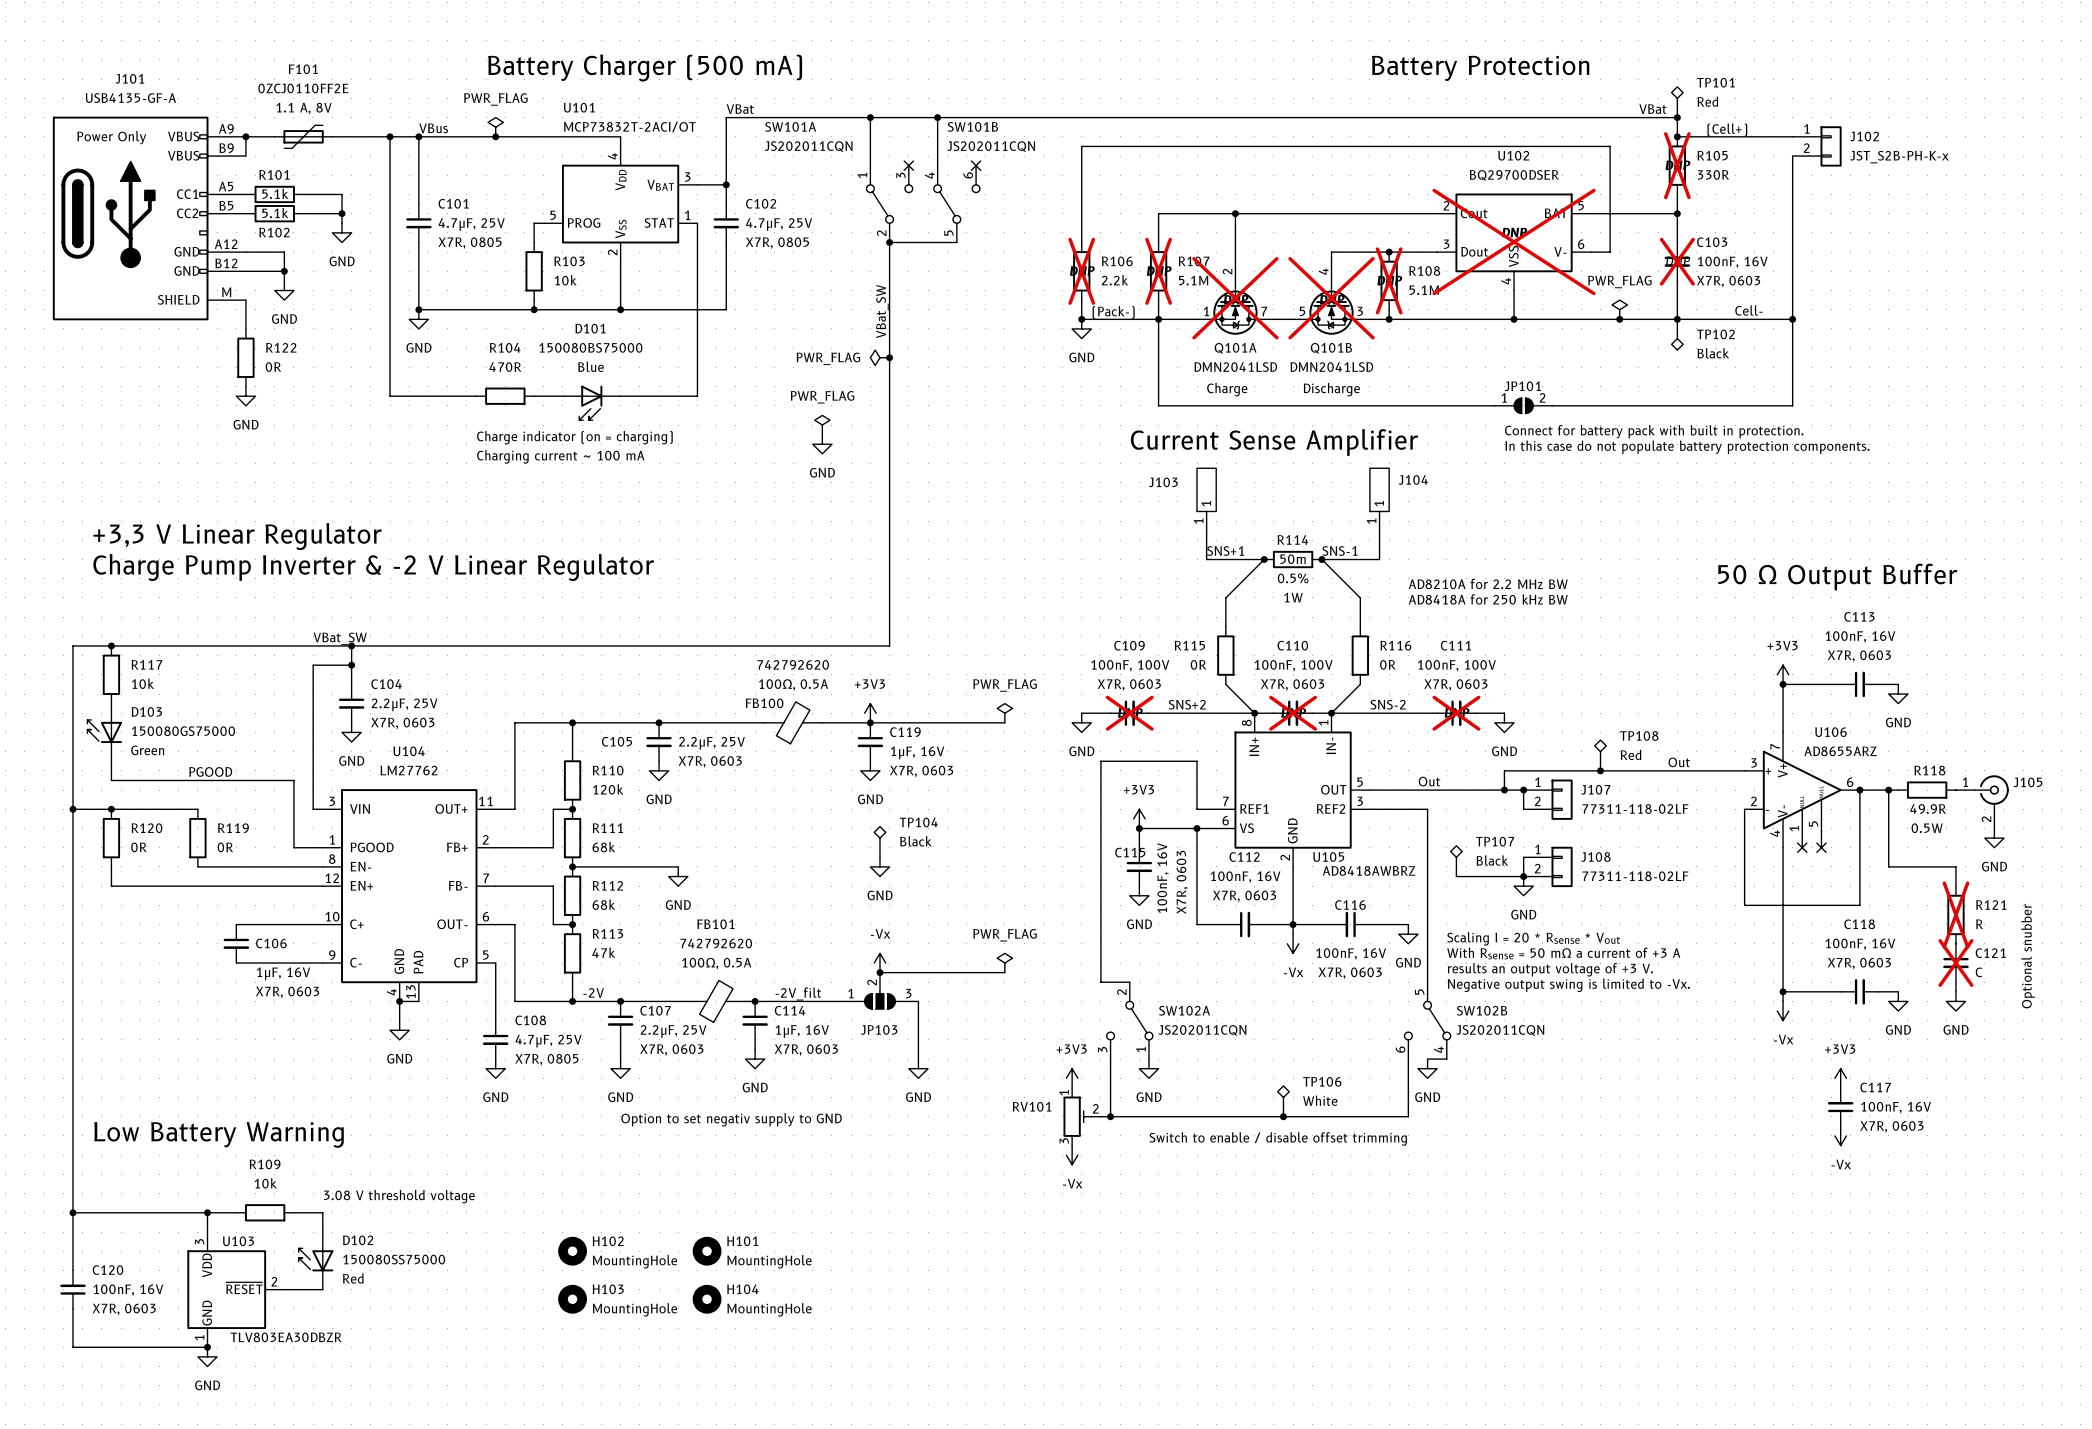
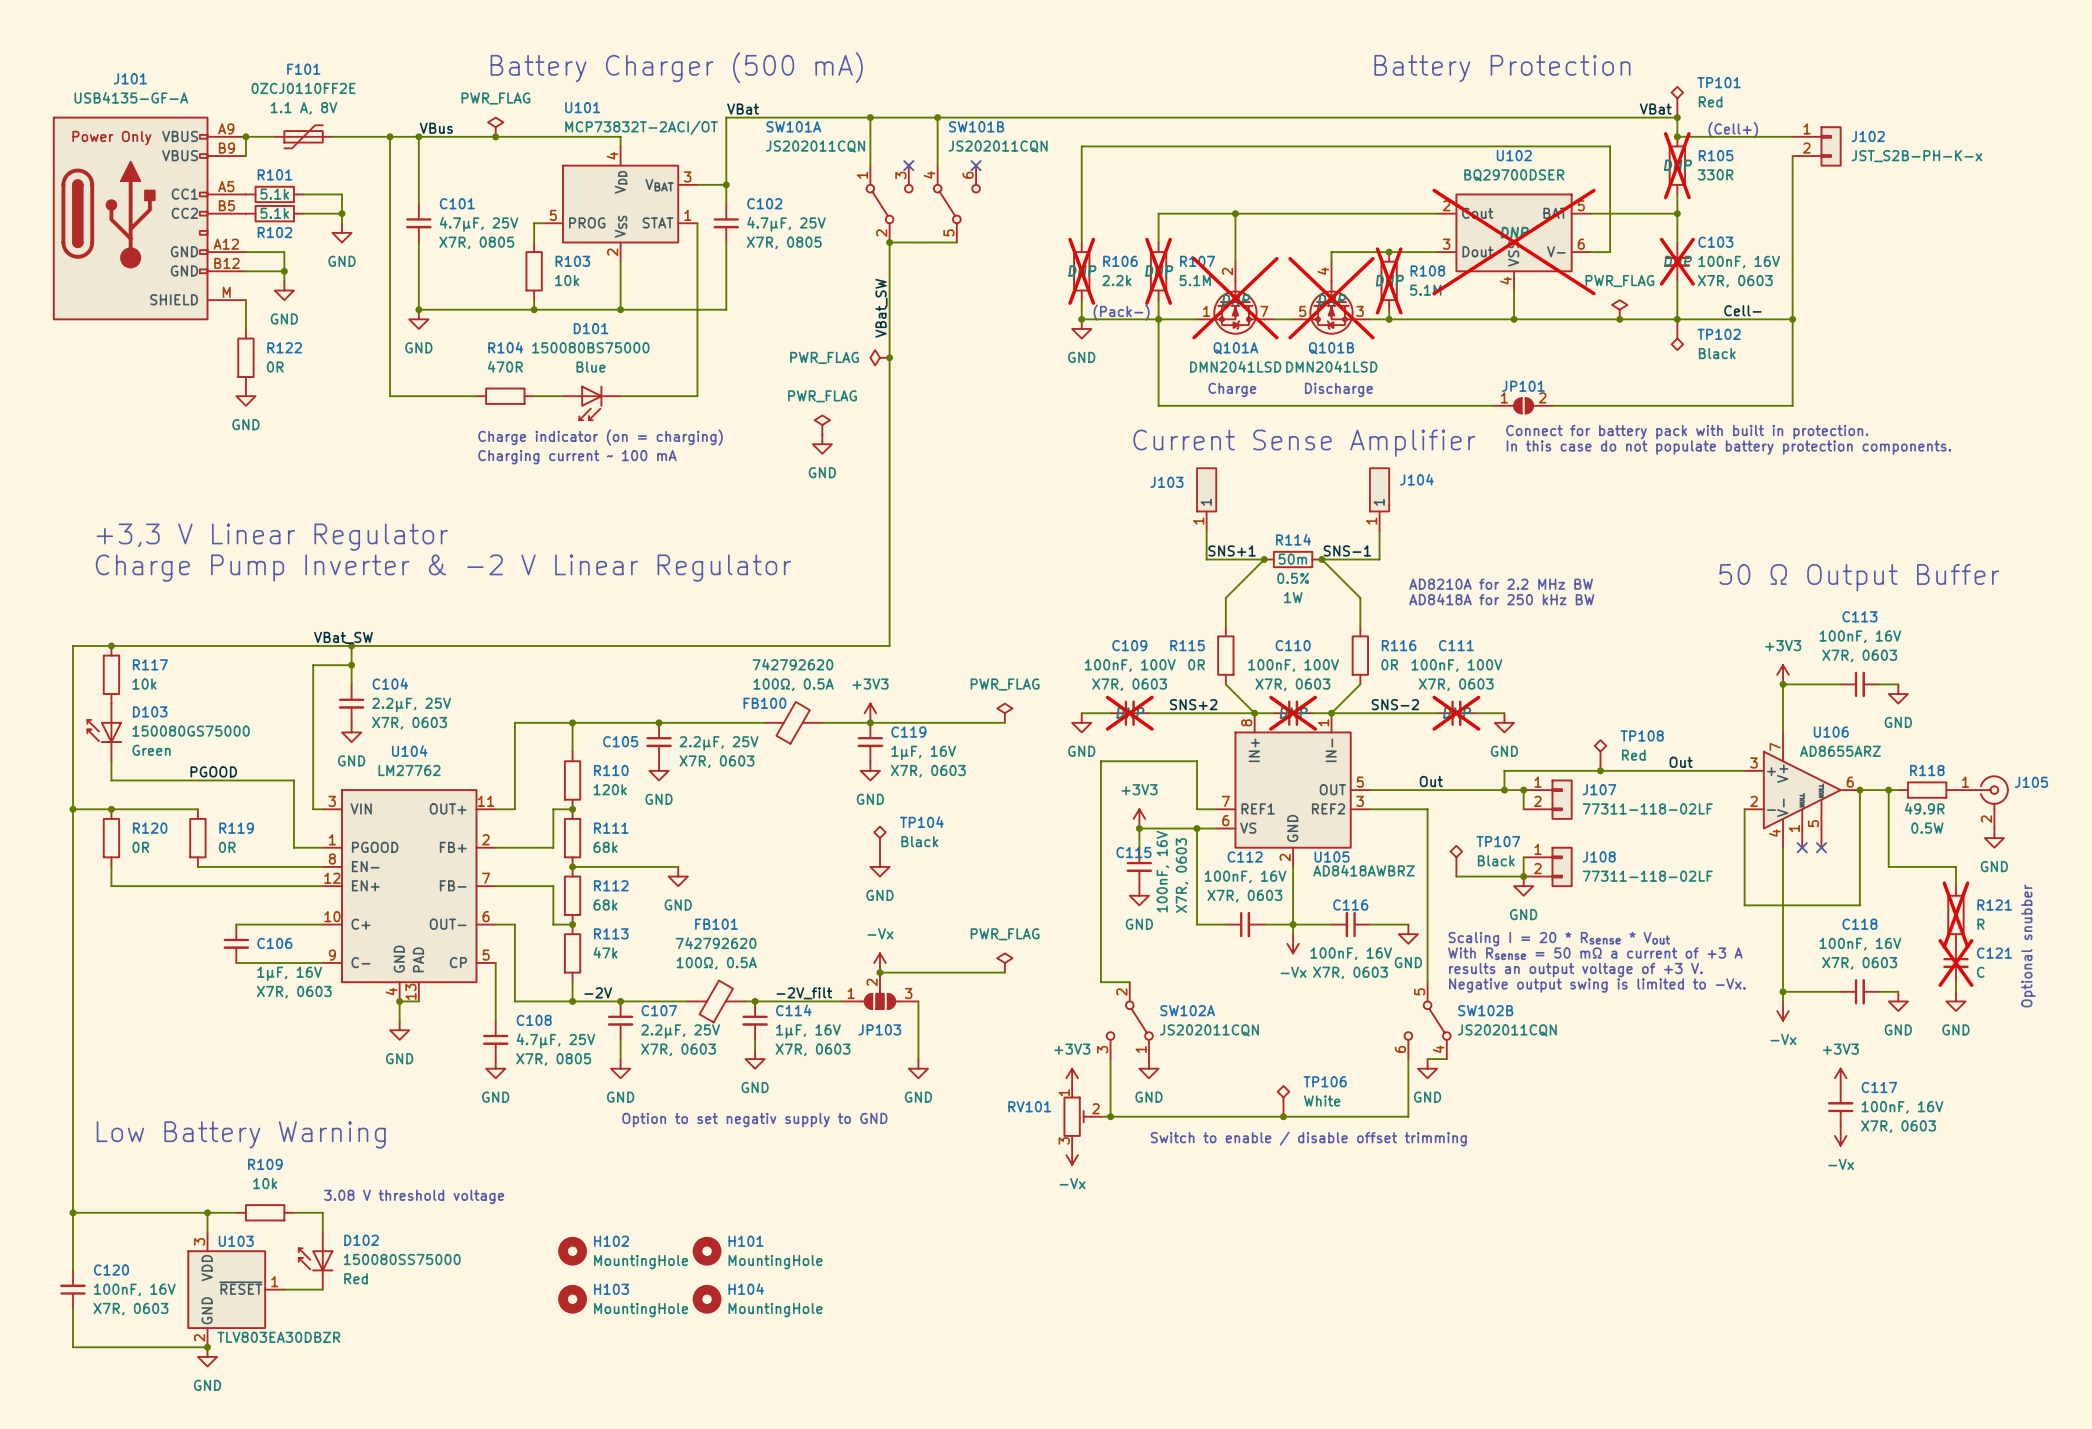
U103 pin number: 2 (274, 1281) -> 1 (274, 1281)
U103 pin number: 1 (199, 1337) -> 2 (199, 1337)

